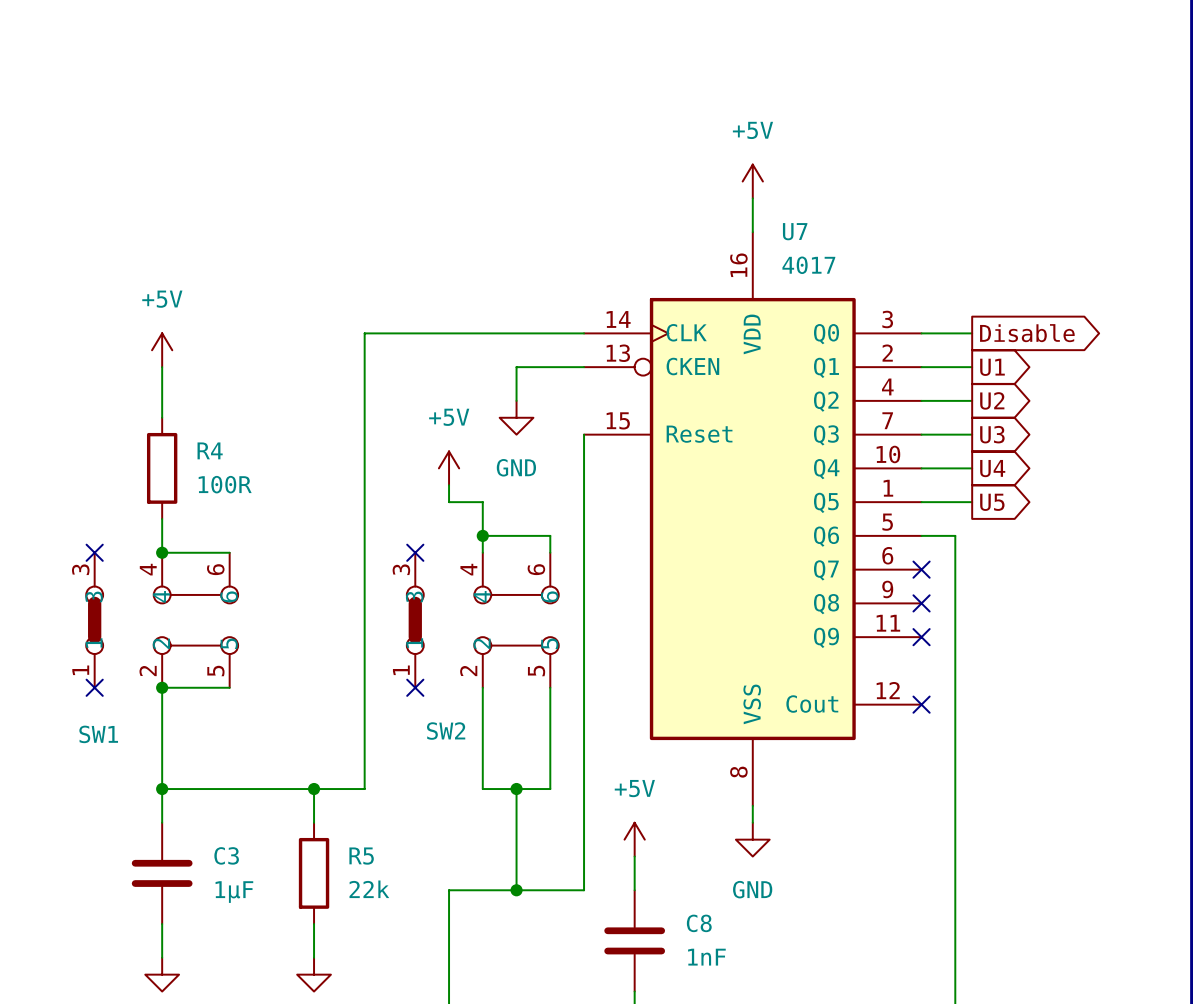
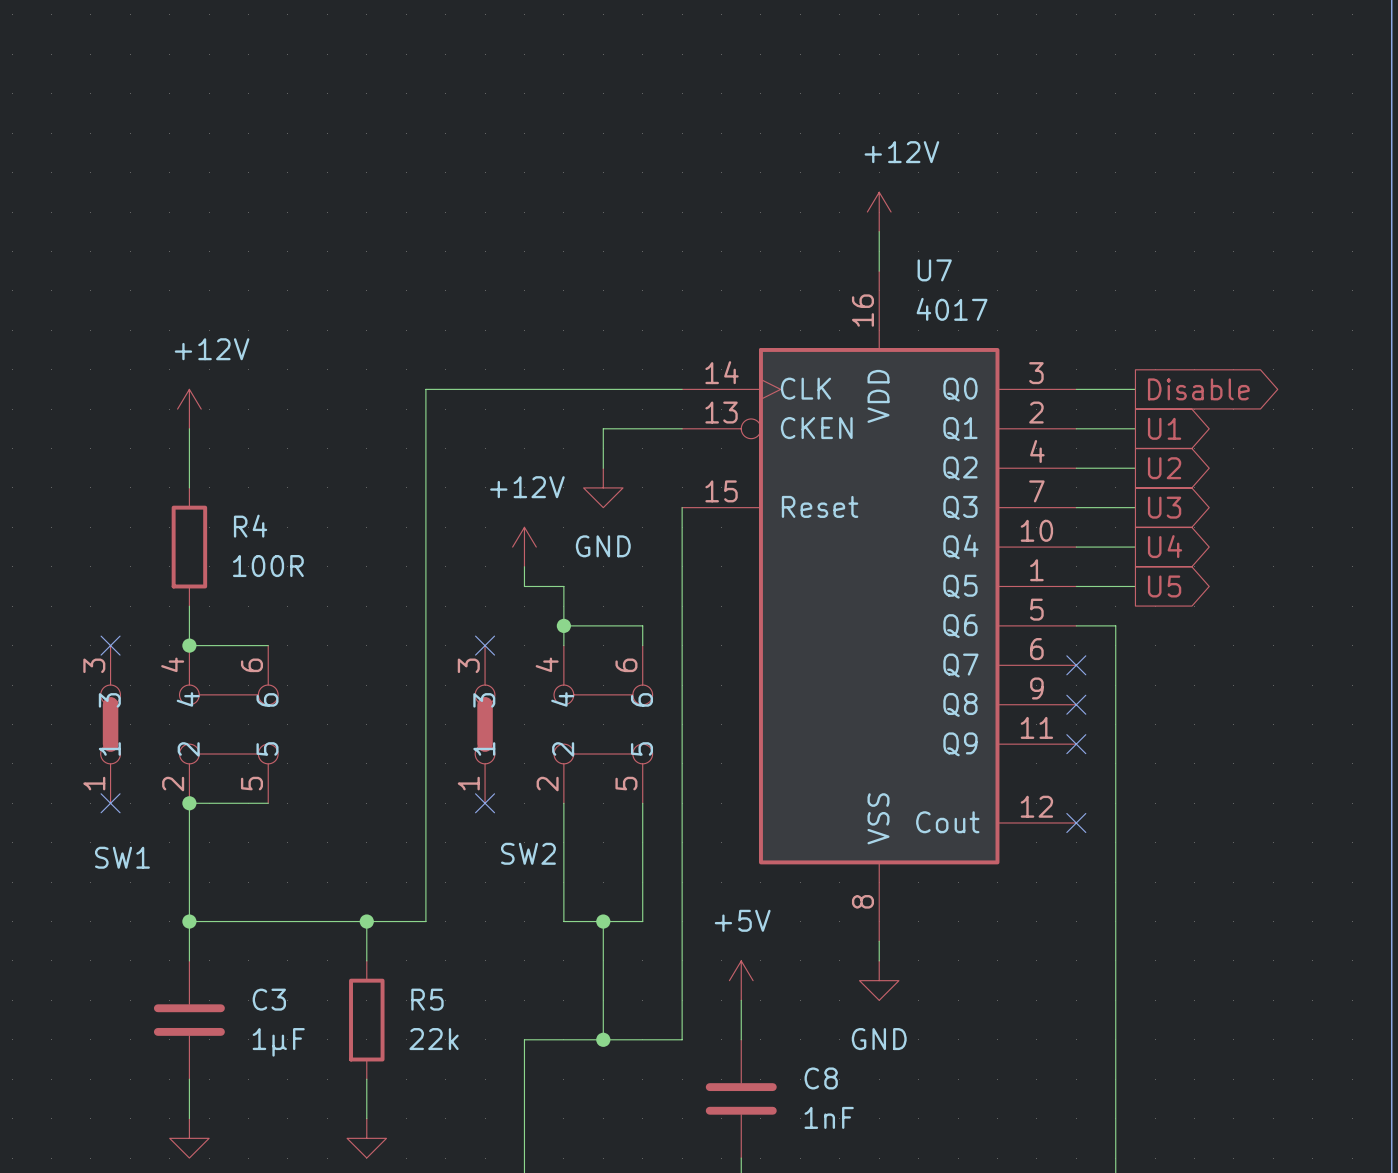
power symbol: +5V (752, 181) -> +12V (879, 212)
power symbol: +5V (162, 350) -> +12V (189, 409)
power symbol: +5V (449, 468) -> +12V (524, 547)

